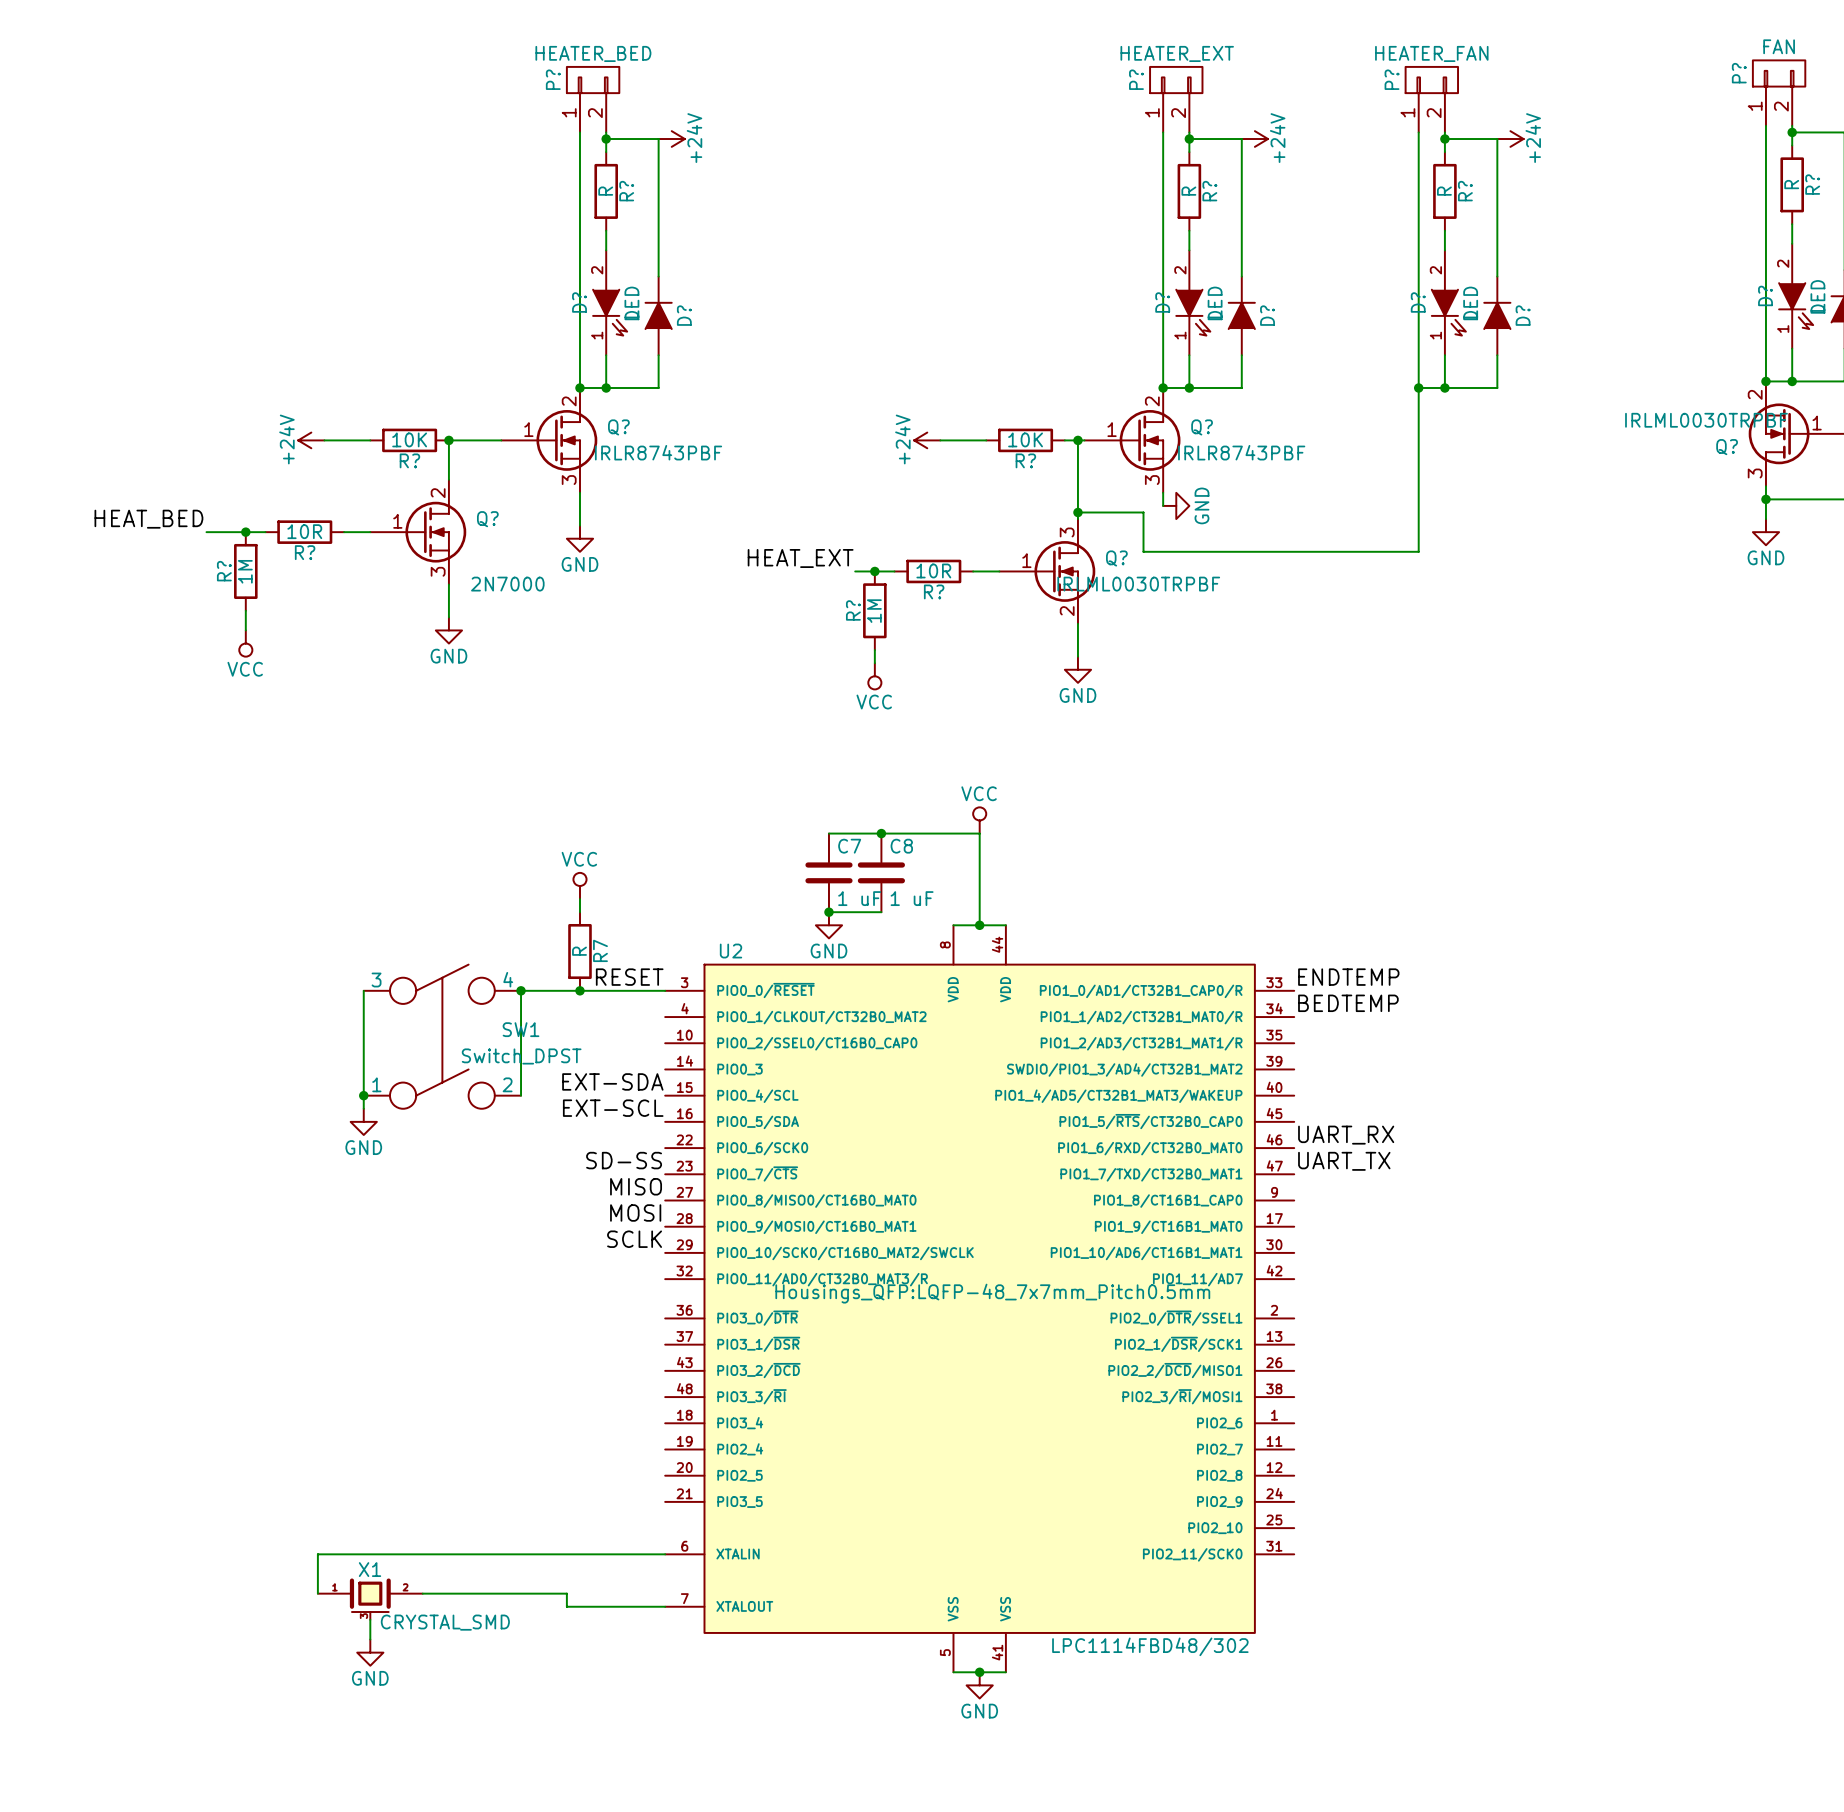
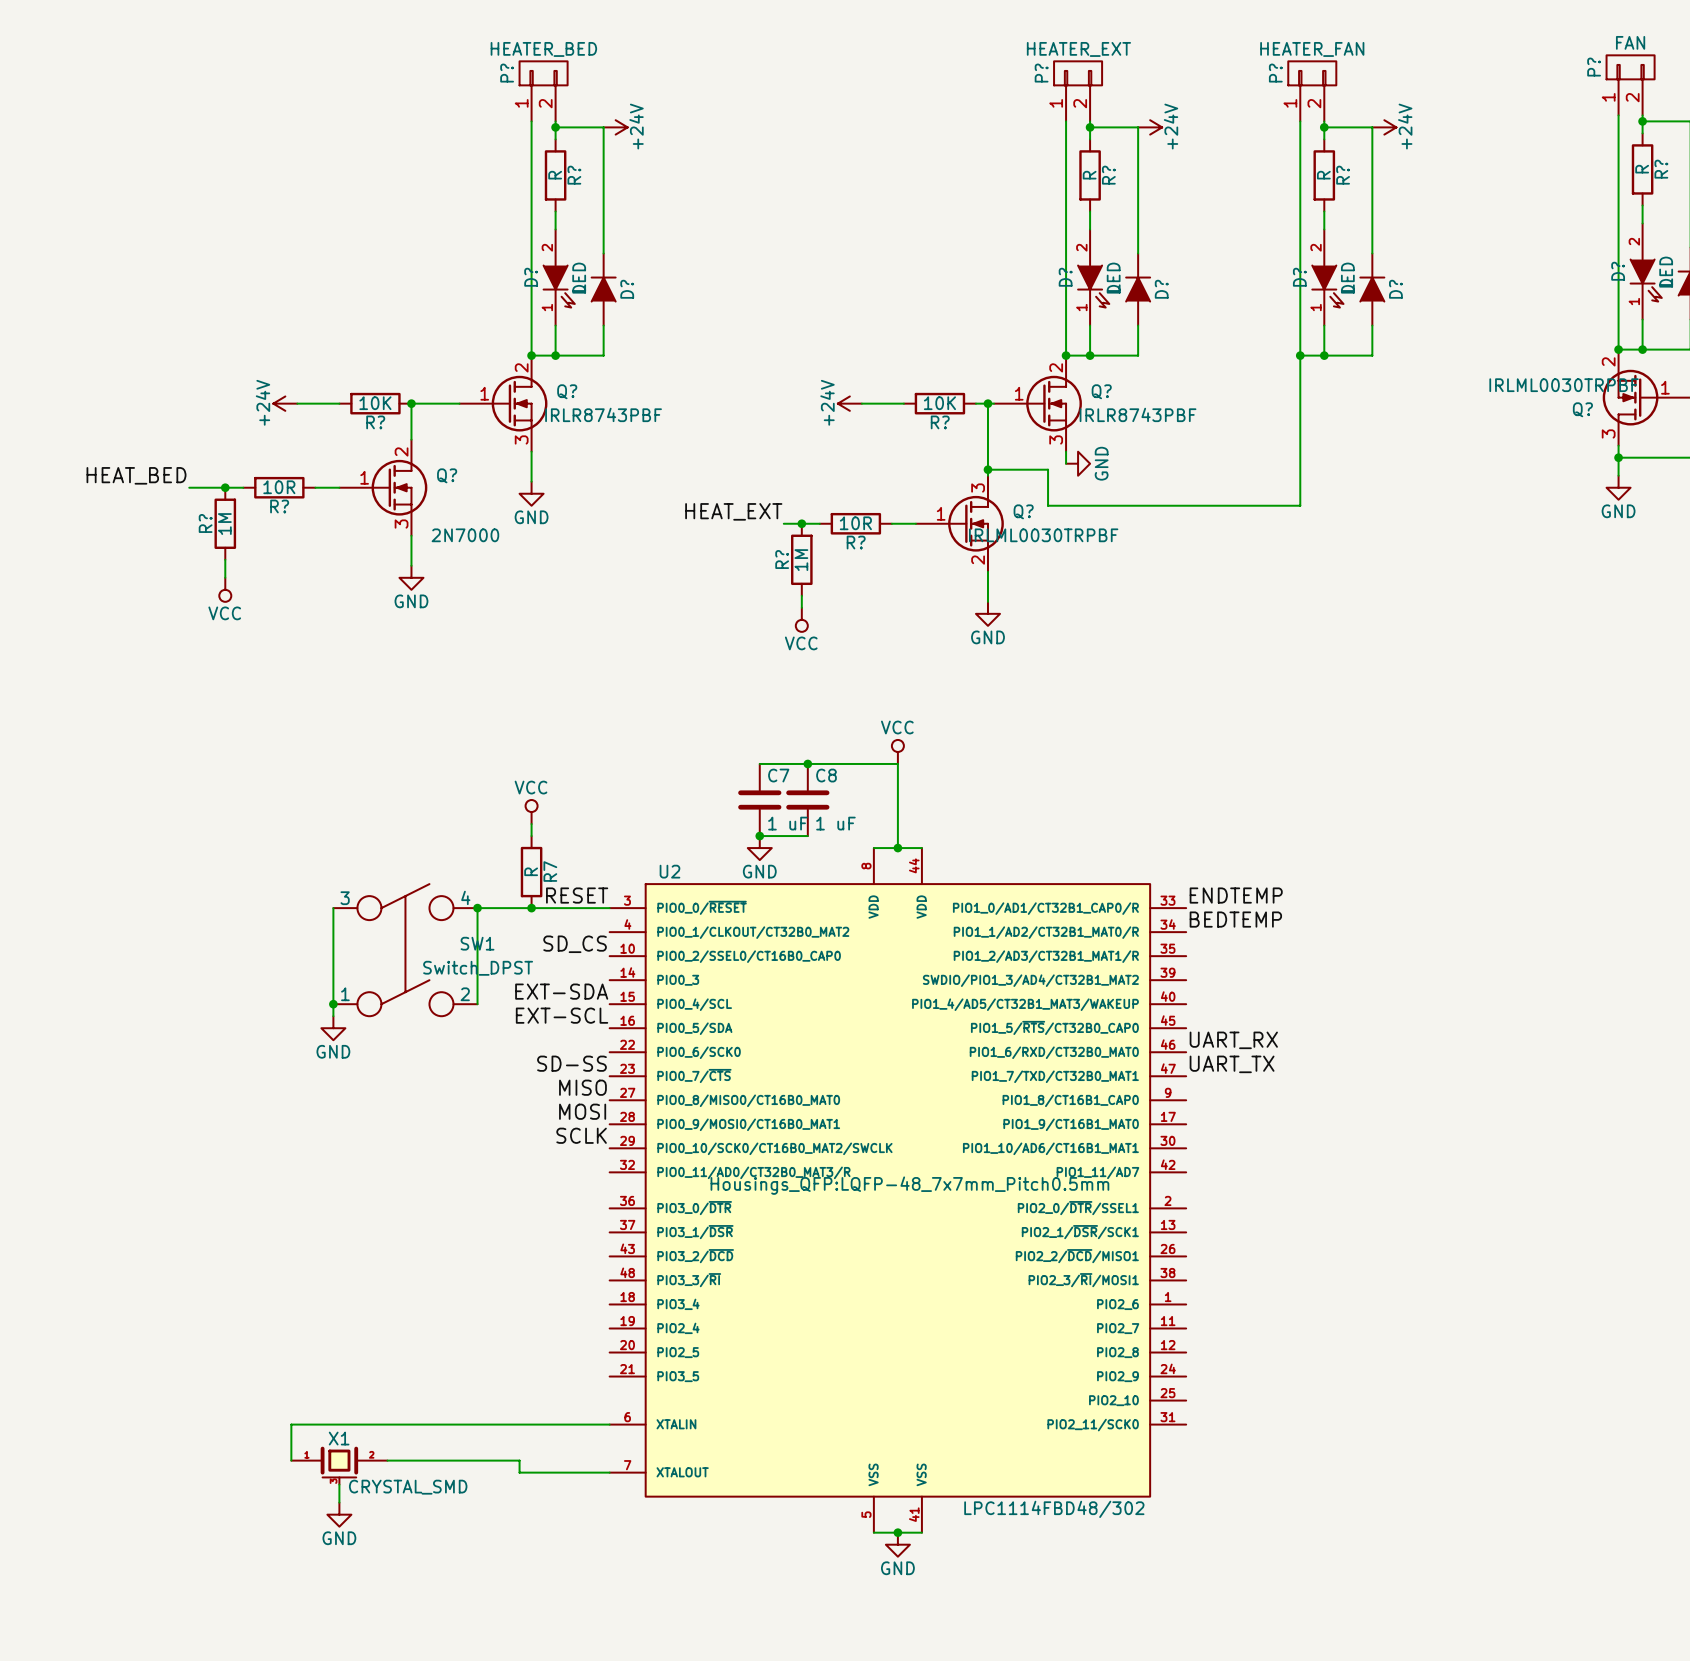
label: none -> SD_CS (575, 944)

